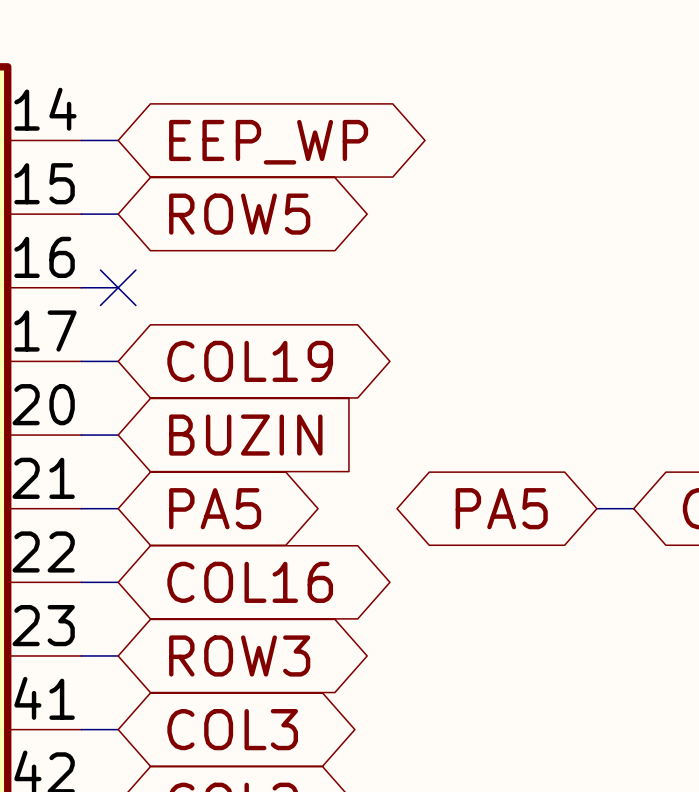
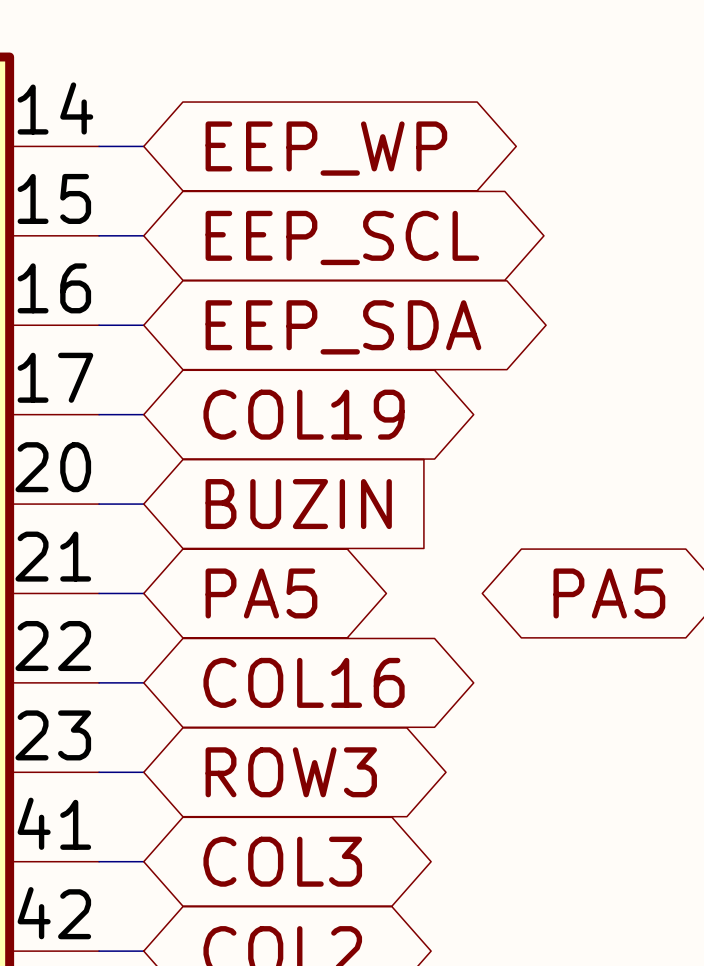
global label: ROW5 (239, 214) -> EEP_SCL (342, 237)
no-connect mark: (118, 287) -> none
global label: none -> EEP_SDA (343, 327)

